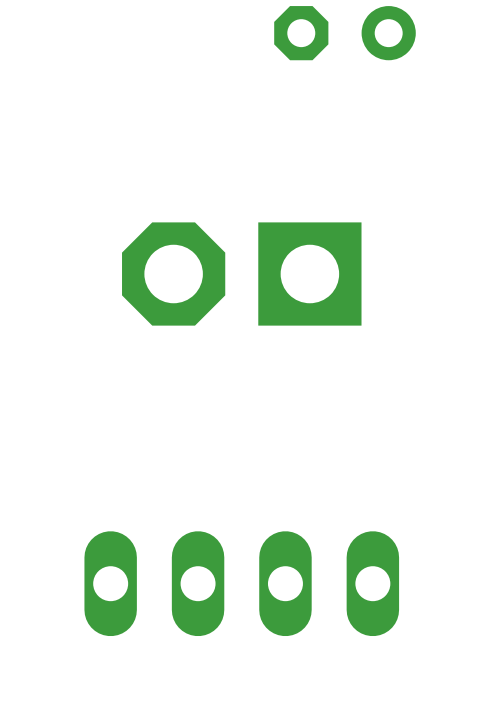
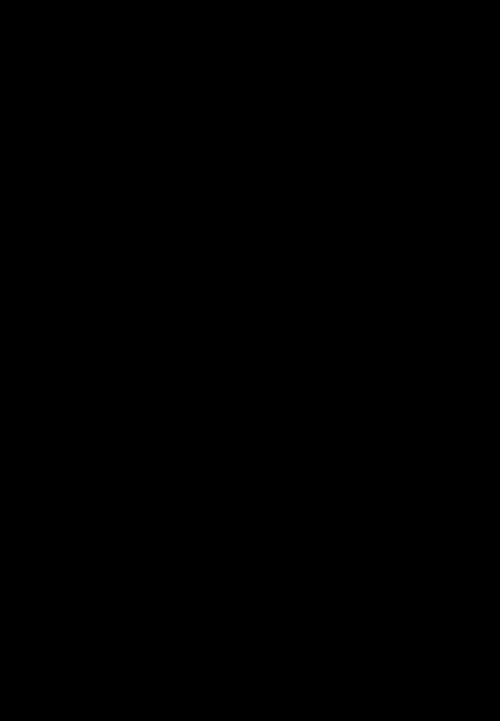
part: (344, 33) -> none
part: (241, 274) -> none
part: (241, 583) -> none

